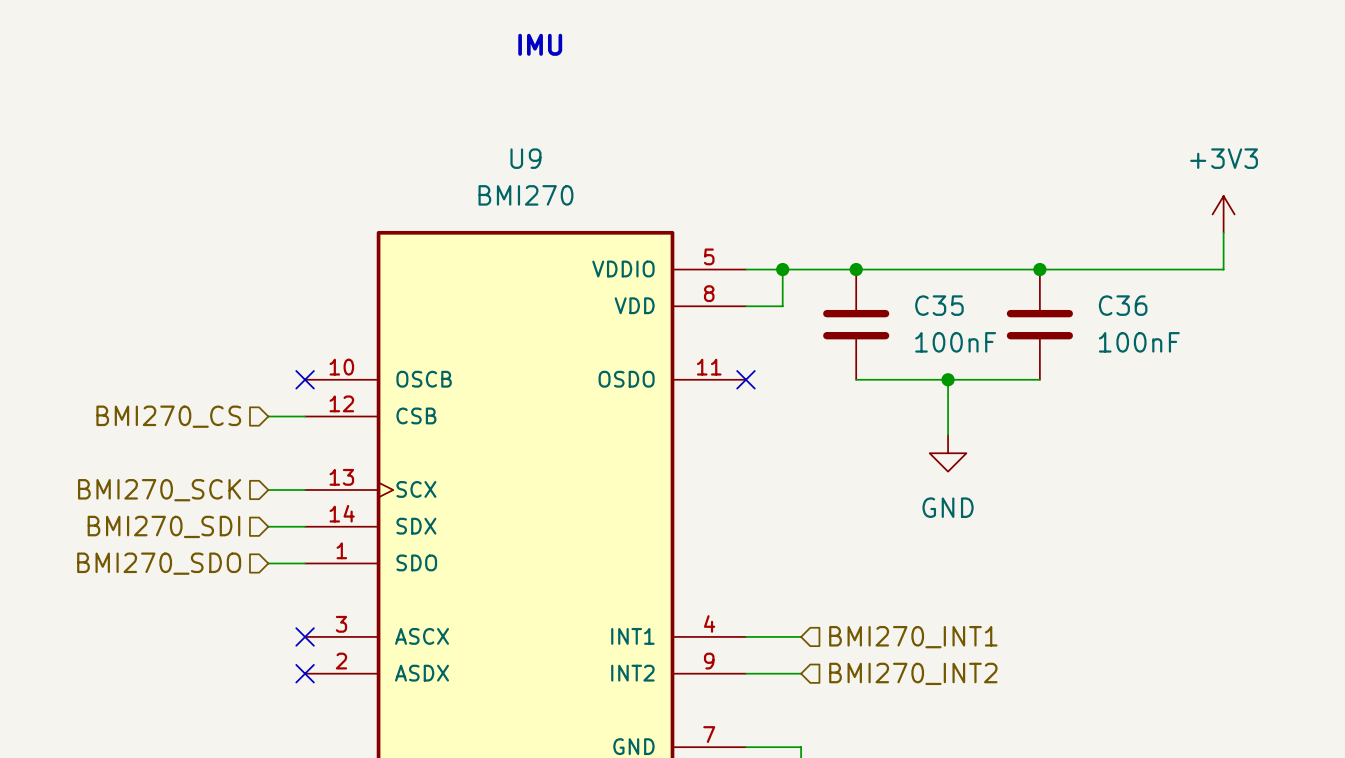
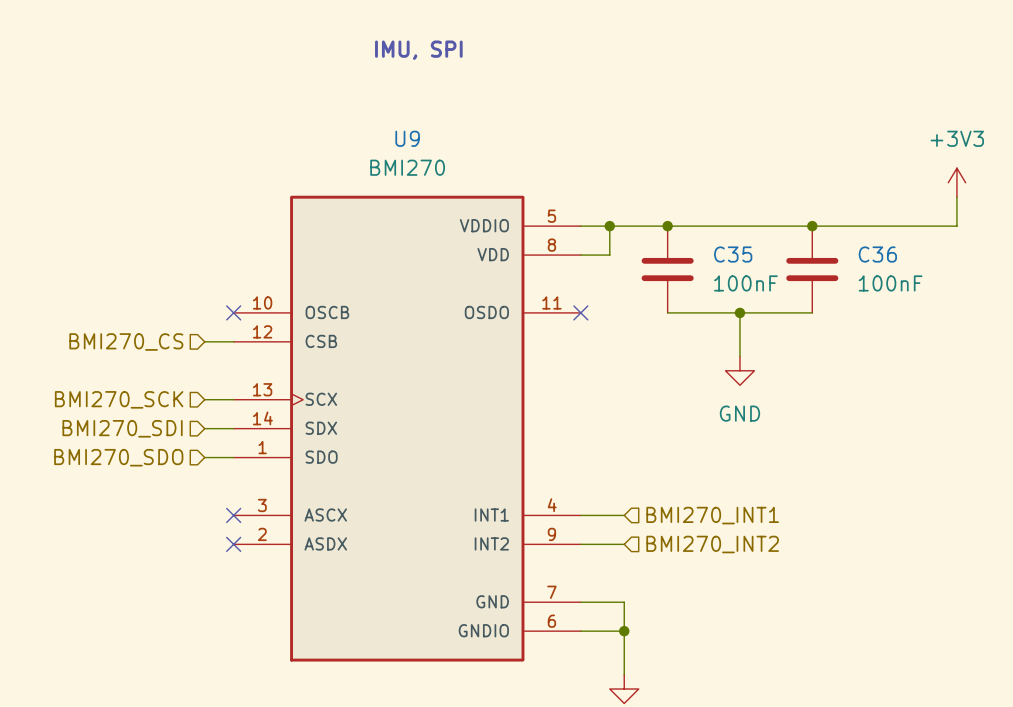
text: IMU (540, 44) -> IMU, SPI (418, 50)

